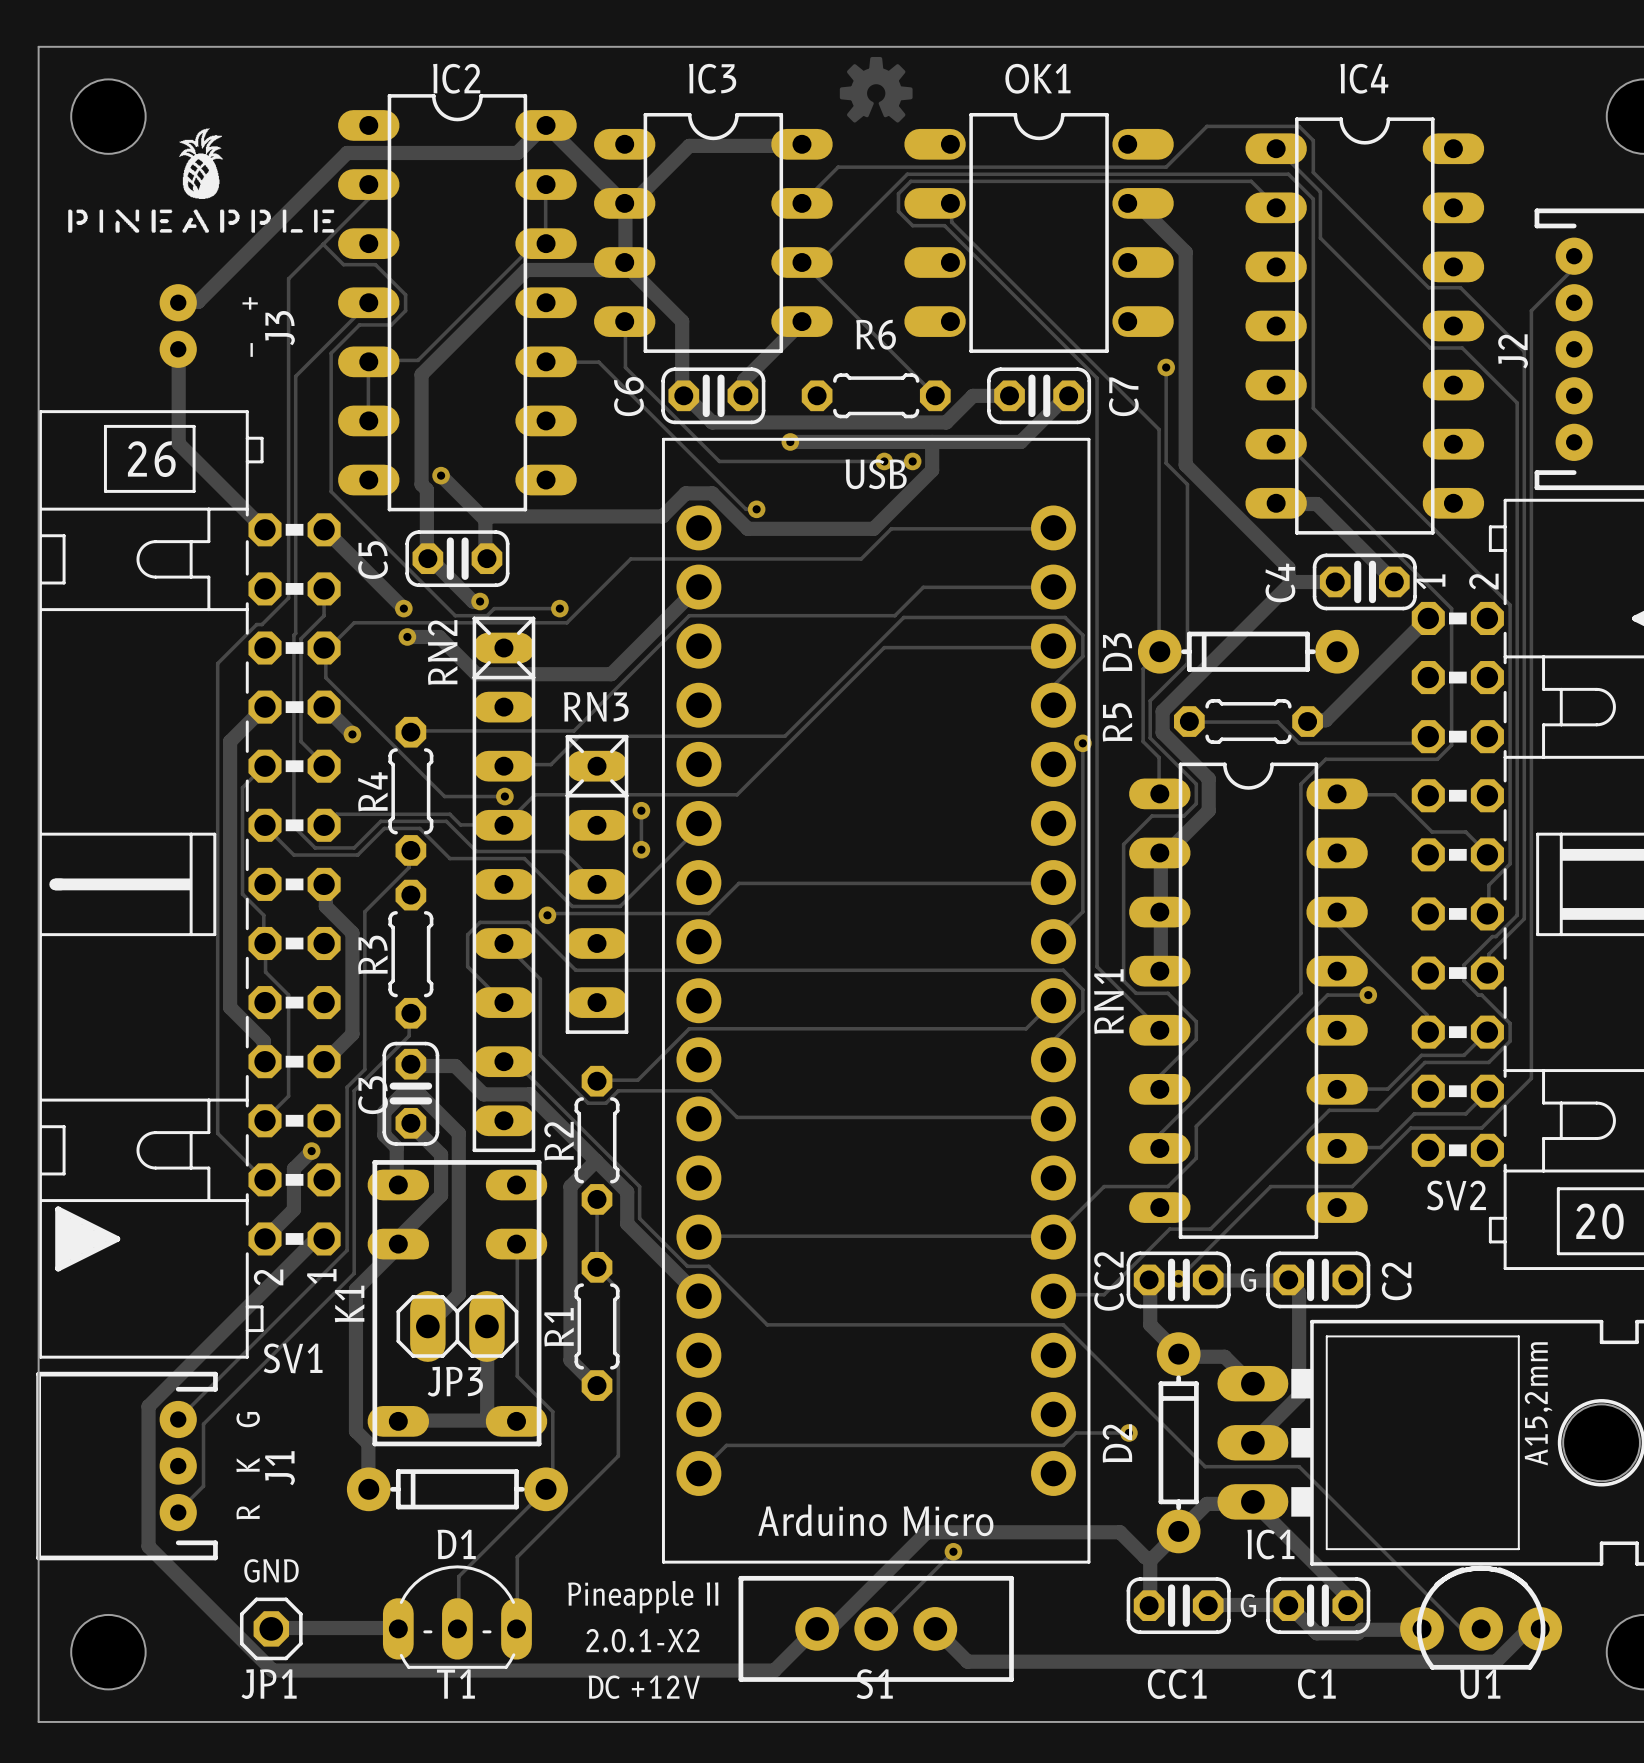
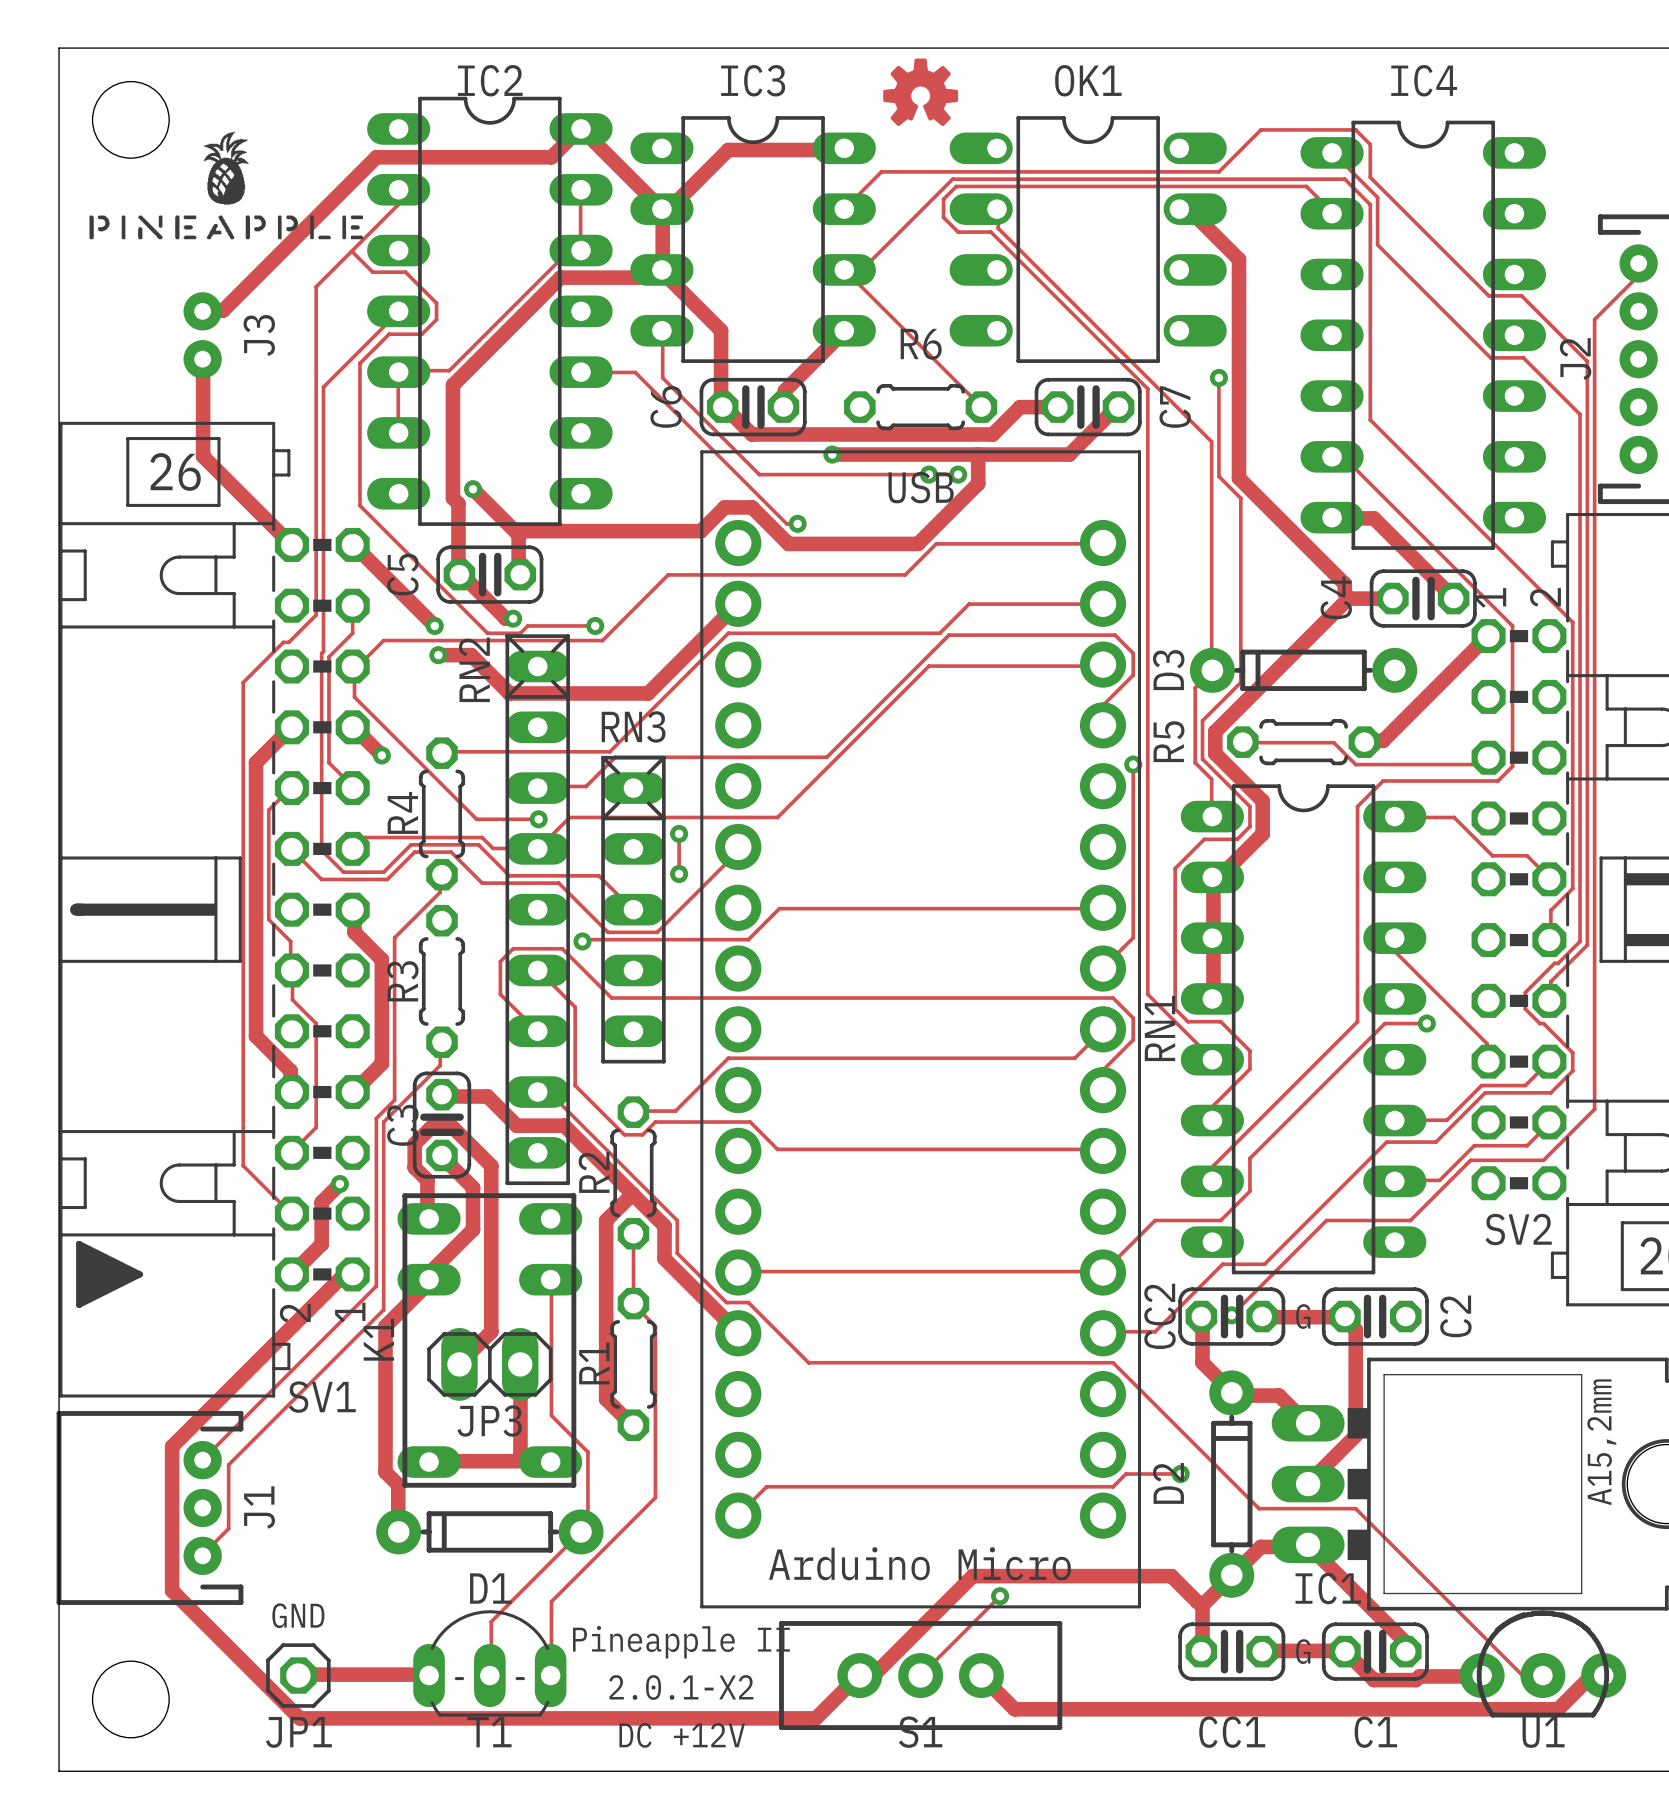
text: + (250, 303) -> none
J3 name position: J3 (279, 328) -> J3 (259, 335)
text: – (251, 349) -> none
text: G (248, 1419) -> none
text: K (248, 1465) -> none
J1 name position: J1 (279, 1468) -> J1 (259, 1507)
text: R (248, 1511) -> none

